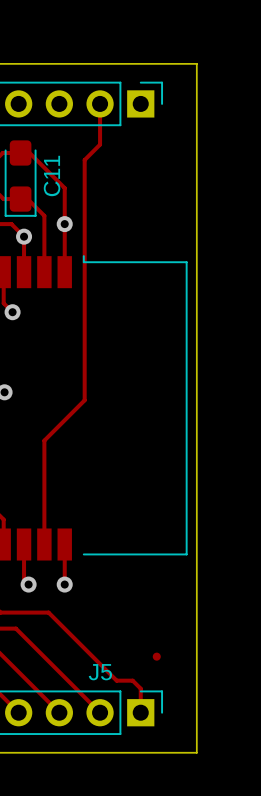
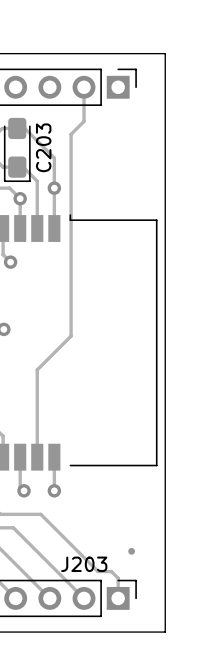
C11 name: C11 (52, 176) -> C203 (43, 147)
J5 name: J5 (100, 672) -> J203 (84, 564)

